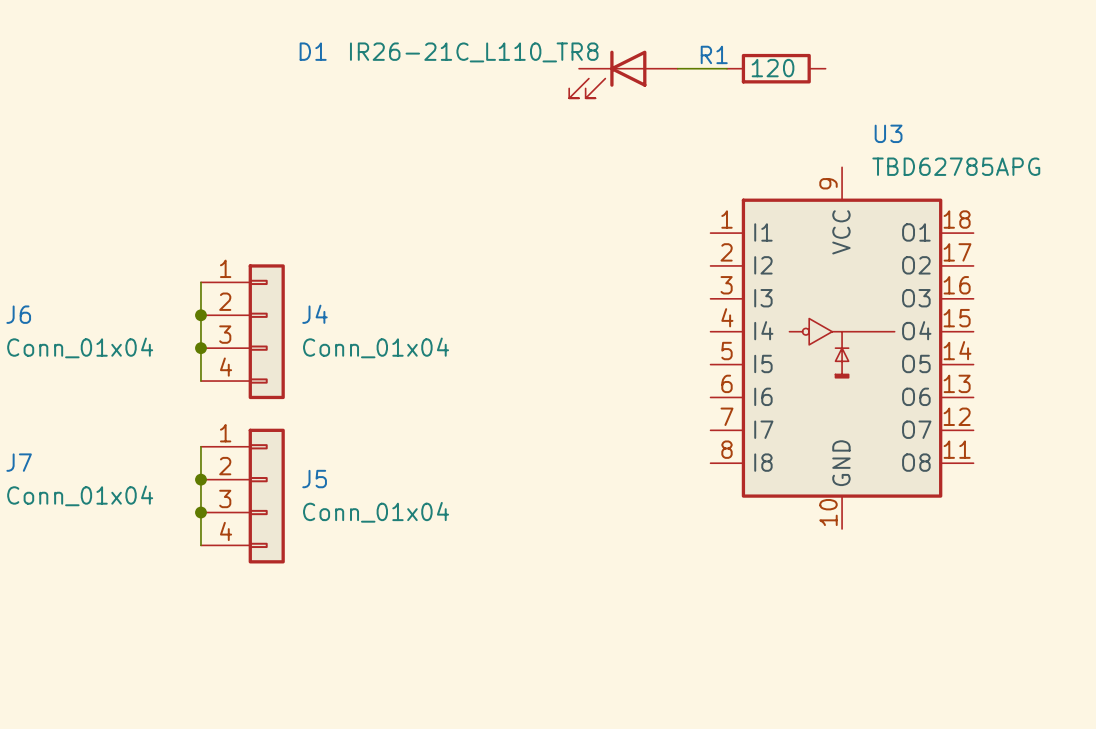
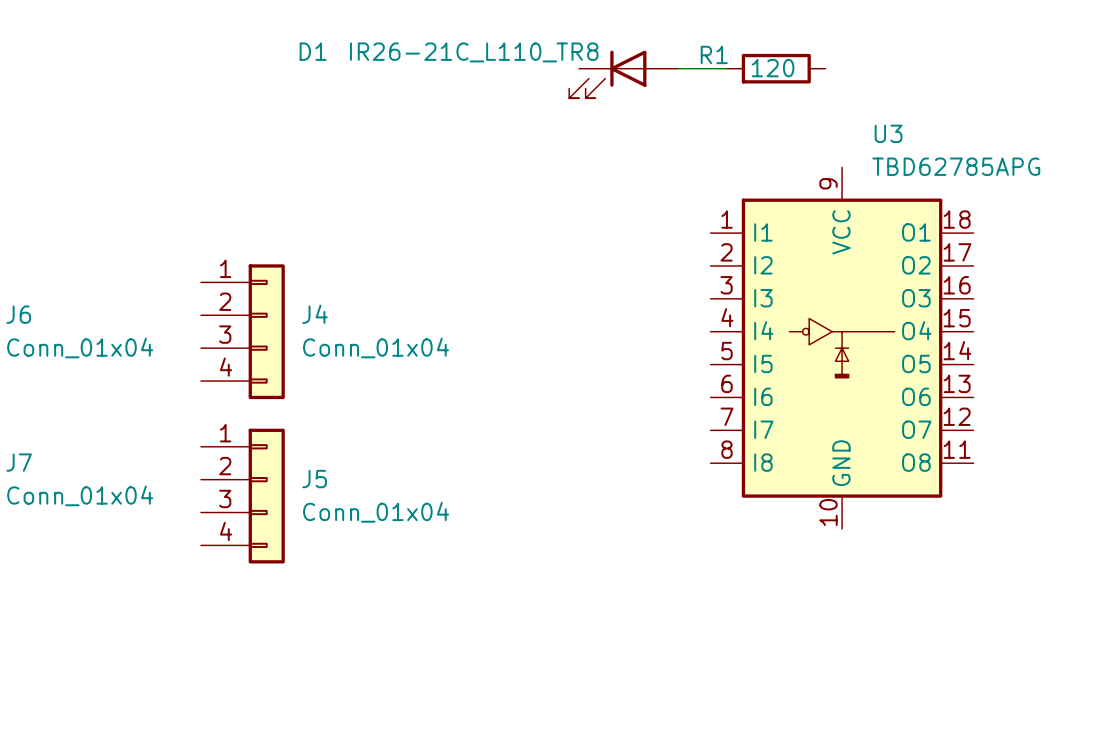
wire: (200, 282) (200, 381) -> none
junction: (200, 315) -> none
junction: (200, 348) -> none
wire: (200, 446) (200, 545) -> none
junction: (200, 479) -> none
junction: (200, 512) -> none

